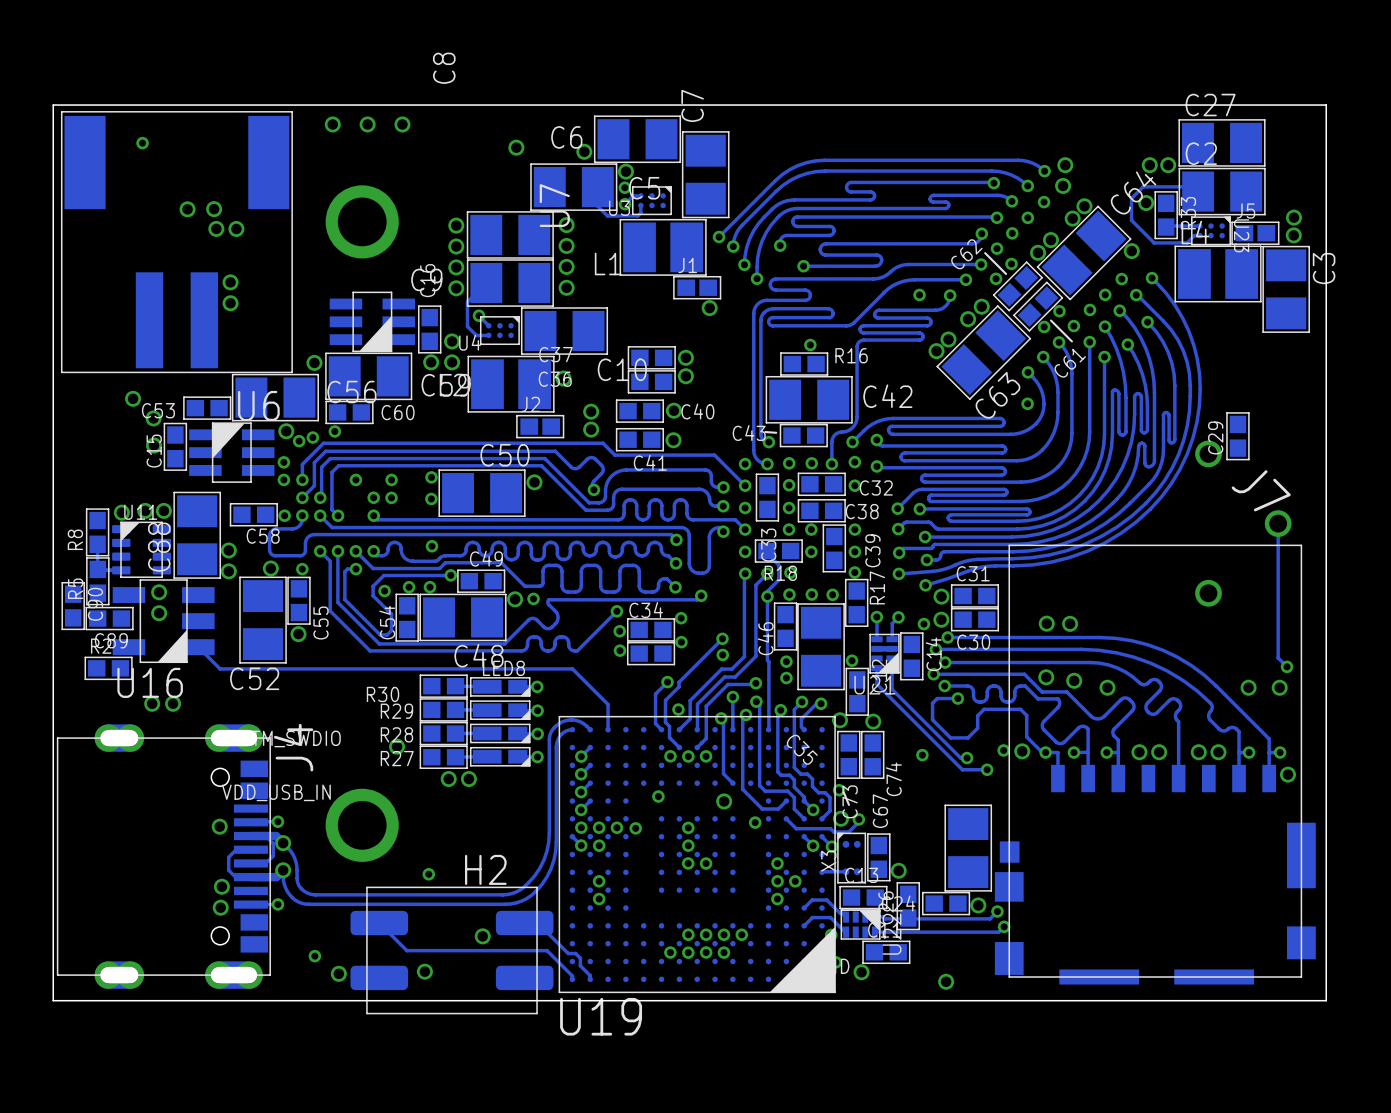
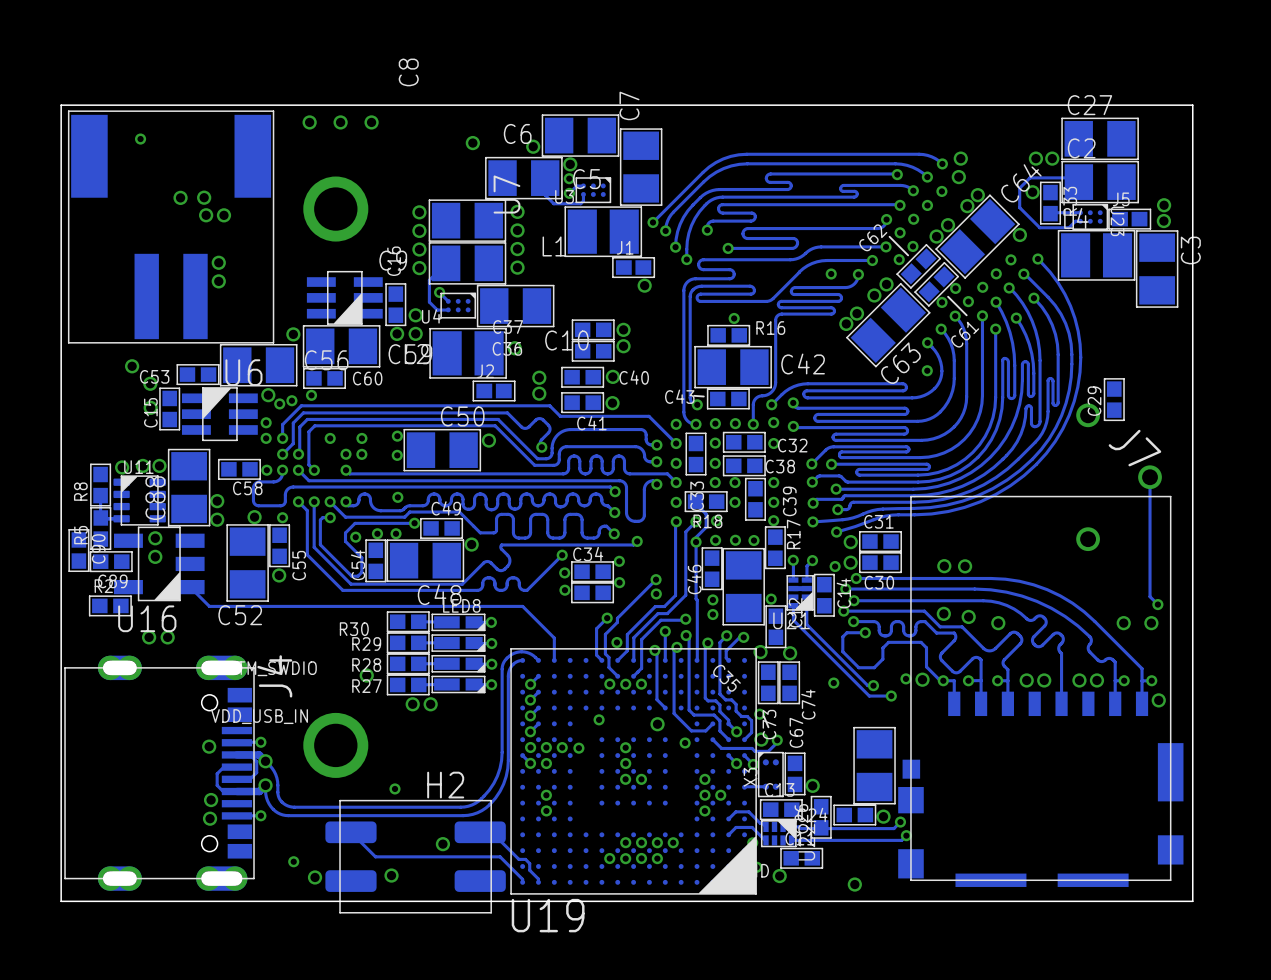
via: (533, 598) -> none

